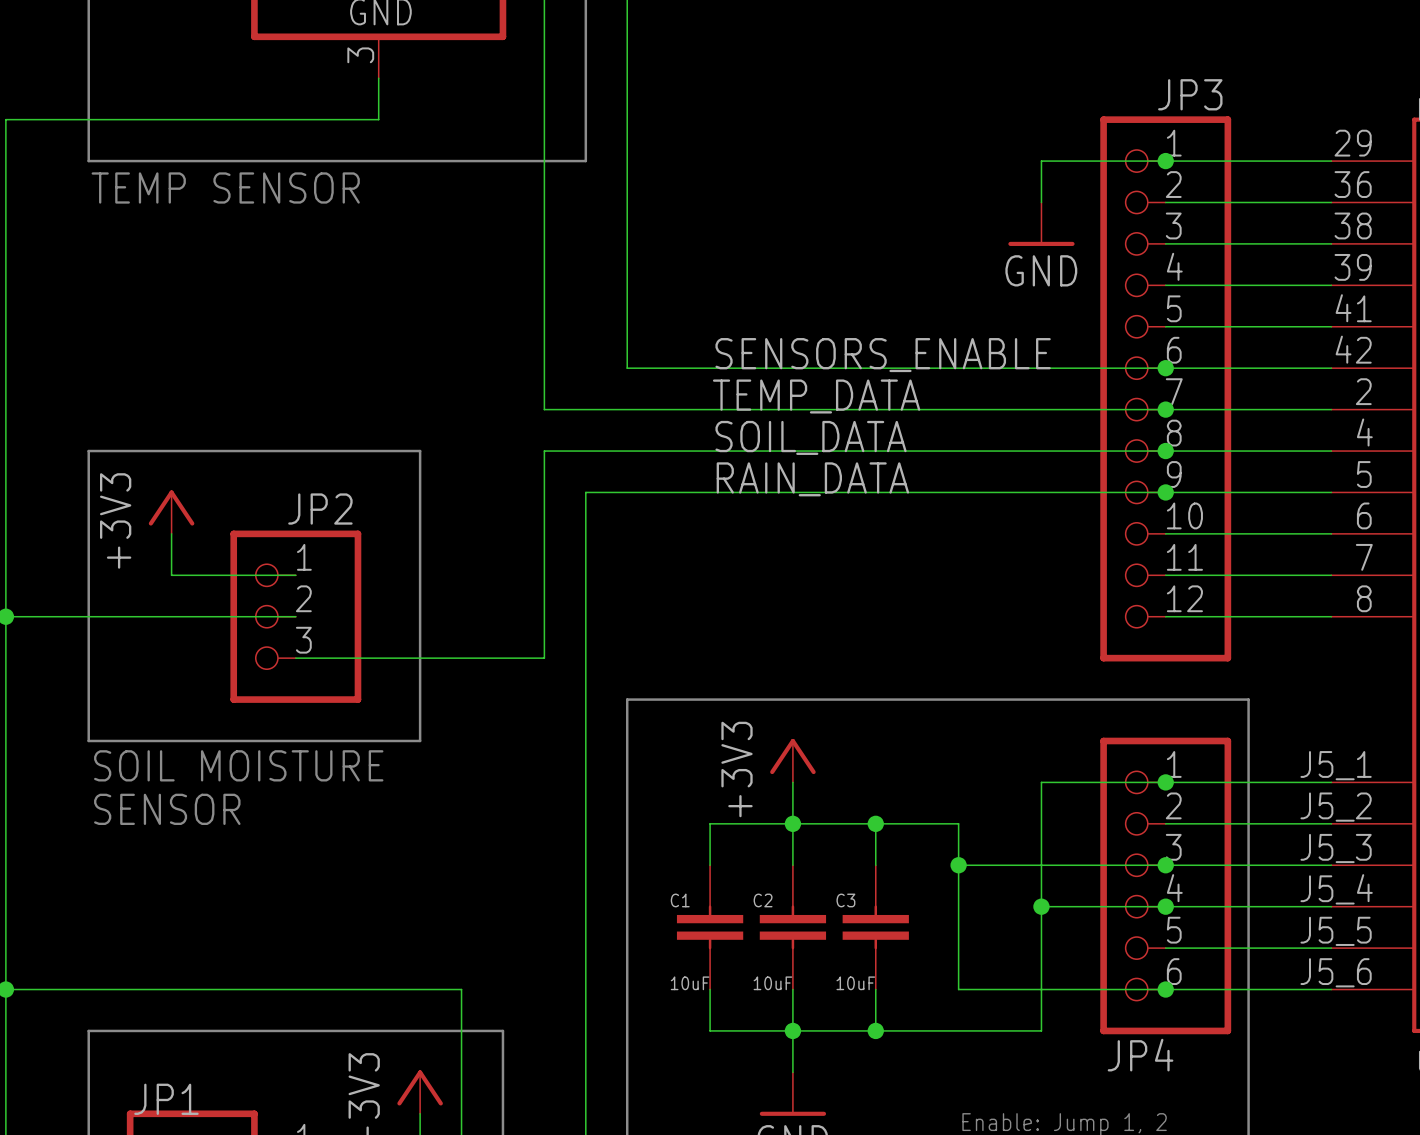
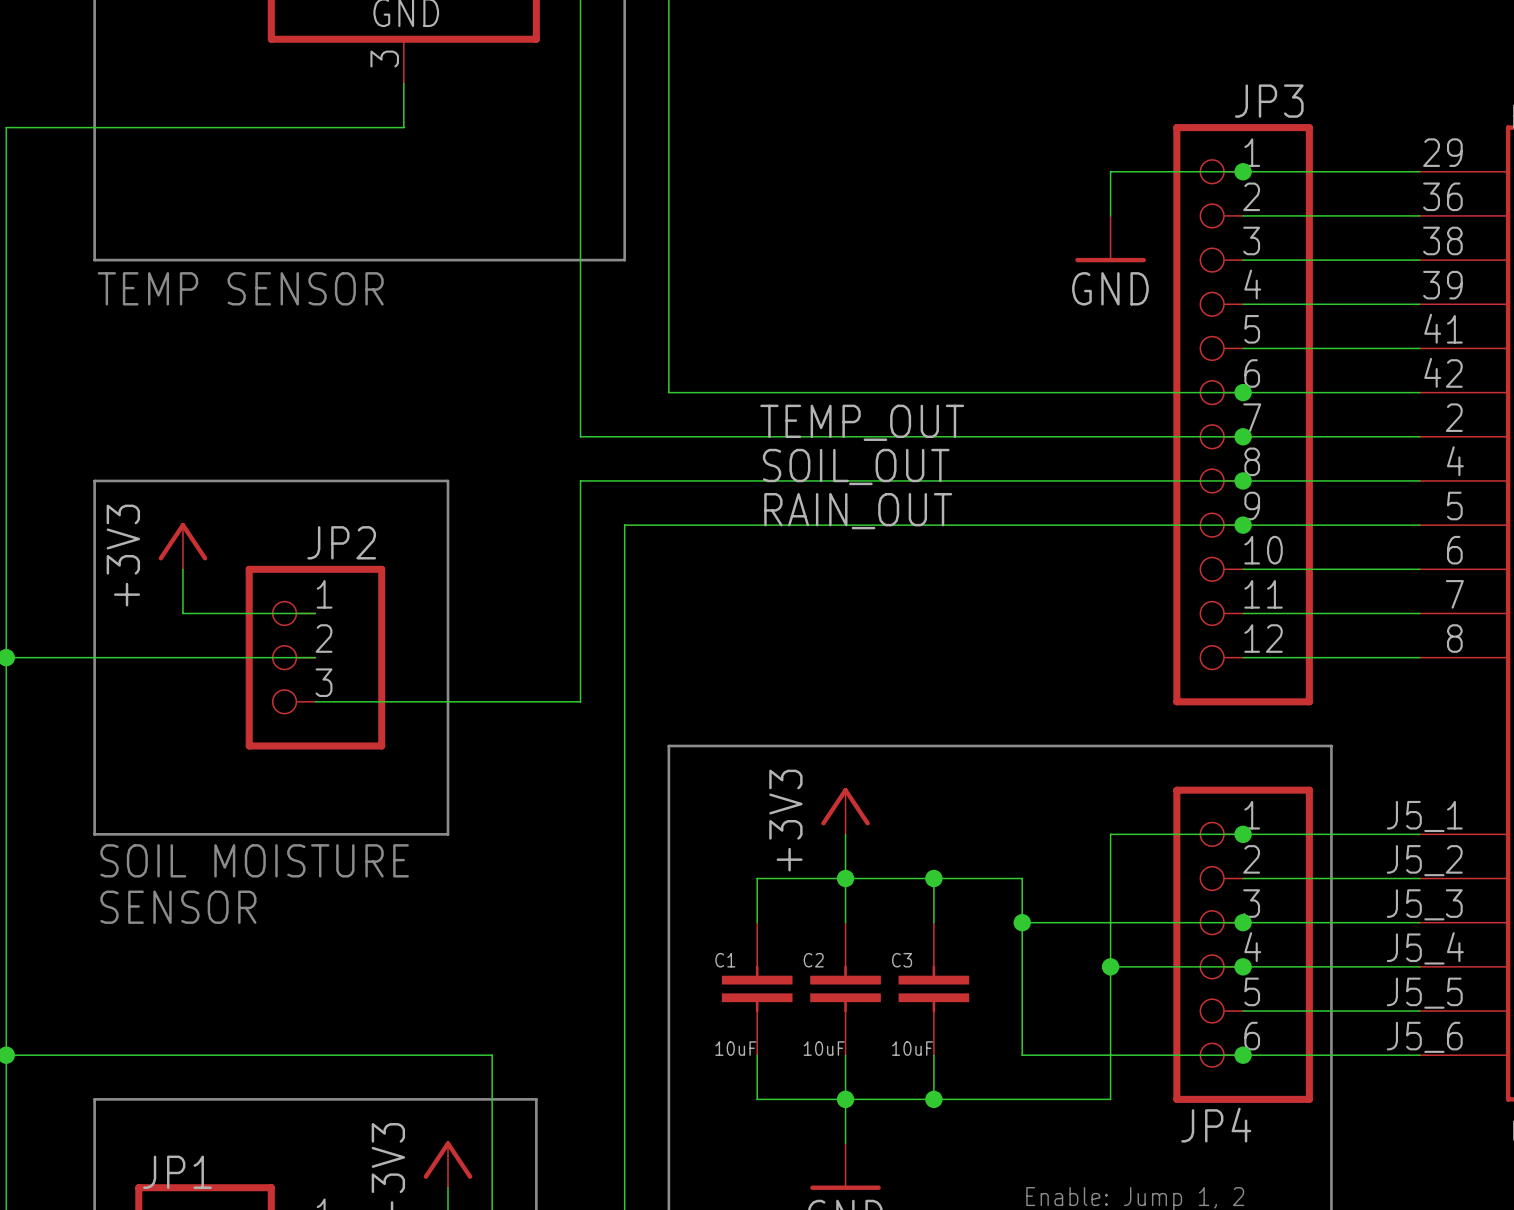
line: (88, 161) (585, 161) -> (94, 171) (94, 260) (624, 260) (624, 171)
text position: TEMP SENSOR (225, 187) -> TEMP SENSOR (240, 288)
label: SENSORS_ENABLE (883, 355) -> none
label: TEMP_DATA (816, 396) -> TEMP_OUT (862, 422)
label: SOIL_DATA (811, 437) -> SOIL_OUT (856, 466)
label: RAIN_DATA (812, 479) -> RAIN_OUT (858, 511)
line: (88, 740) (420, 740) -> (94, 790) (94, 834) (448, 834) (448, 790)
text: SOIL MOISTURE (238, 765) -> none
text: SENSOR (167, 809) -> SOIL MOISTURE (254, 860)
text: none -> SENSOR (178, 907)

